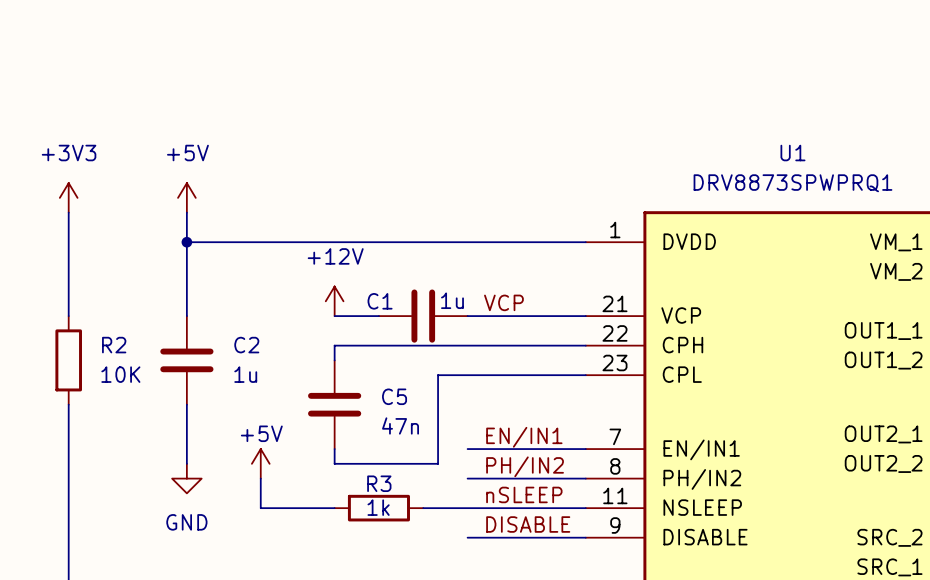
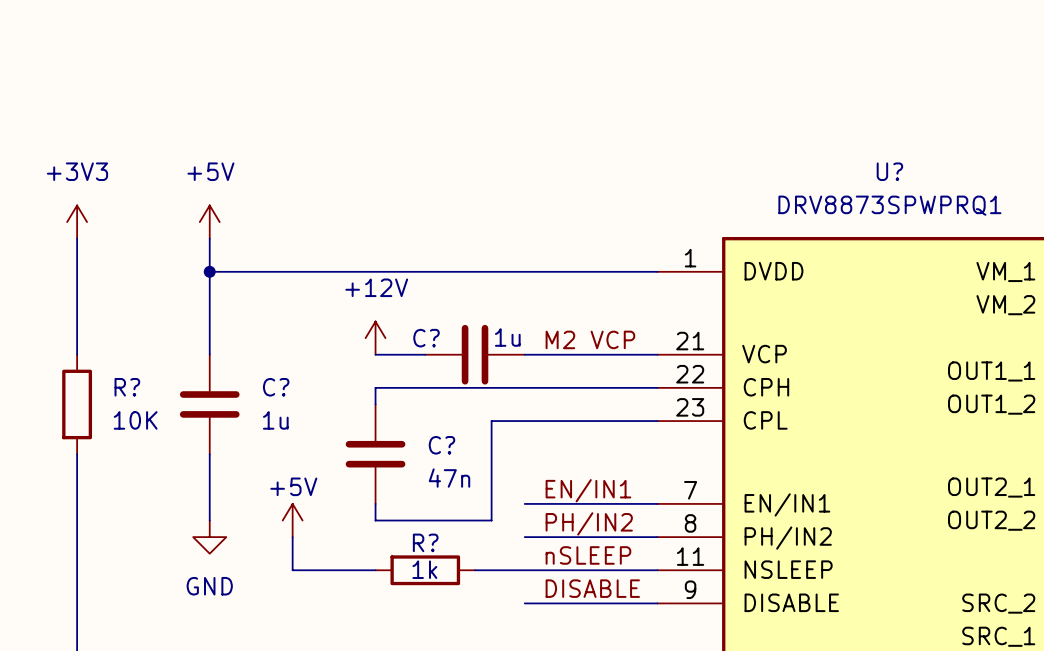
U1 name: U1 (792, 153) -> U? (889, 171)
C1 name: C1 (380, 301) -> C? (426, 338)
label: VCP (503, 302) -> M2 VCP (590, 339)
R2 name: R2 (114, 345) -> R? (127, 387)
C2 name: C2 (246, 345) -> C? (276, 387)
C5 name: C5 (394, 396) -> C? (441, 445)
R3 name: R3 (379, 483) -> R? (425, 542)

